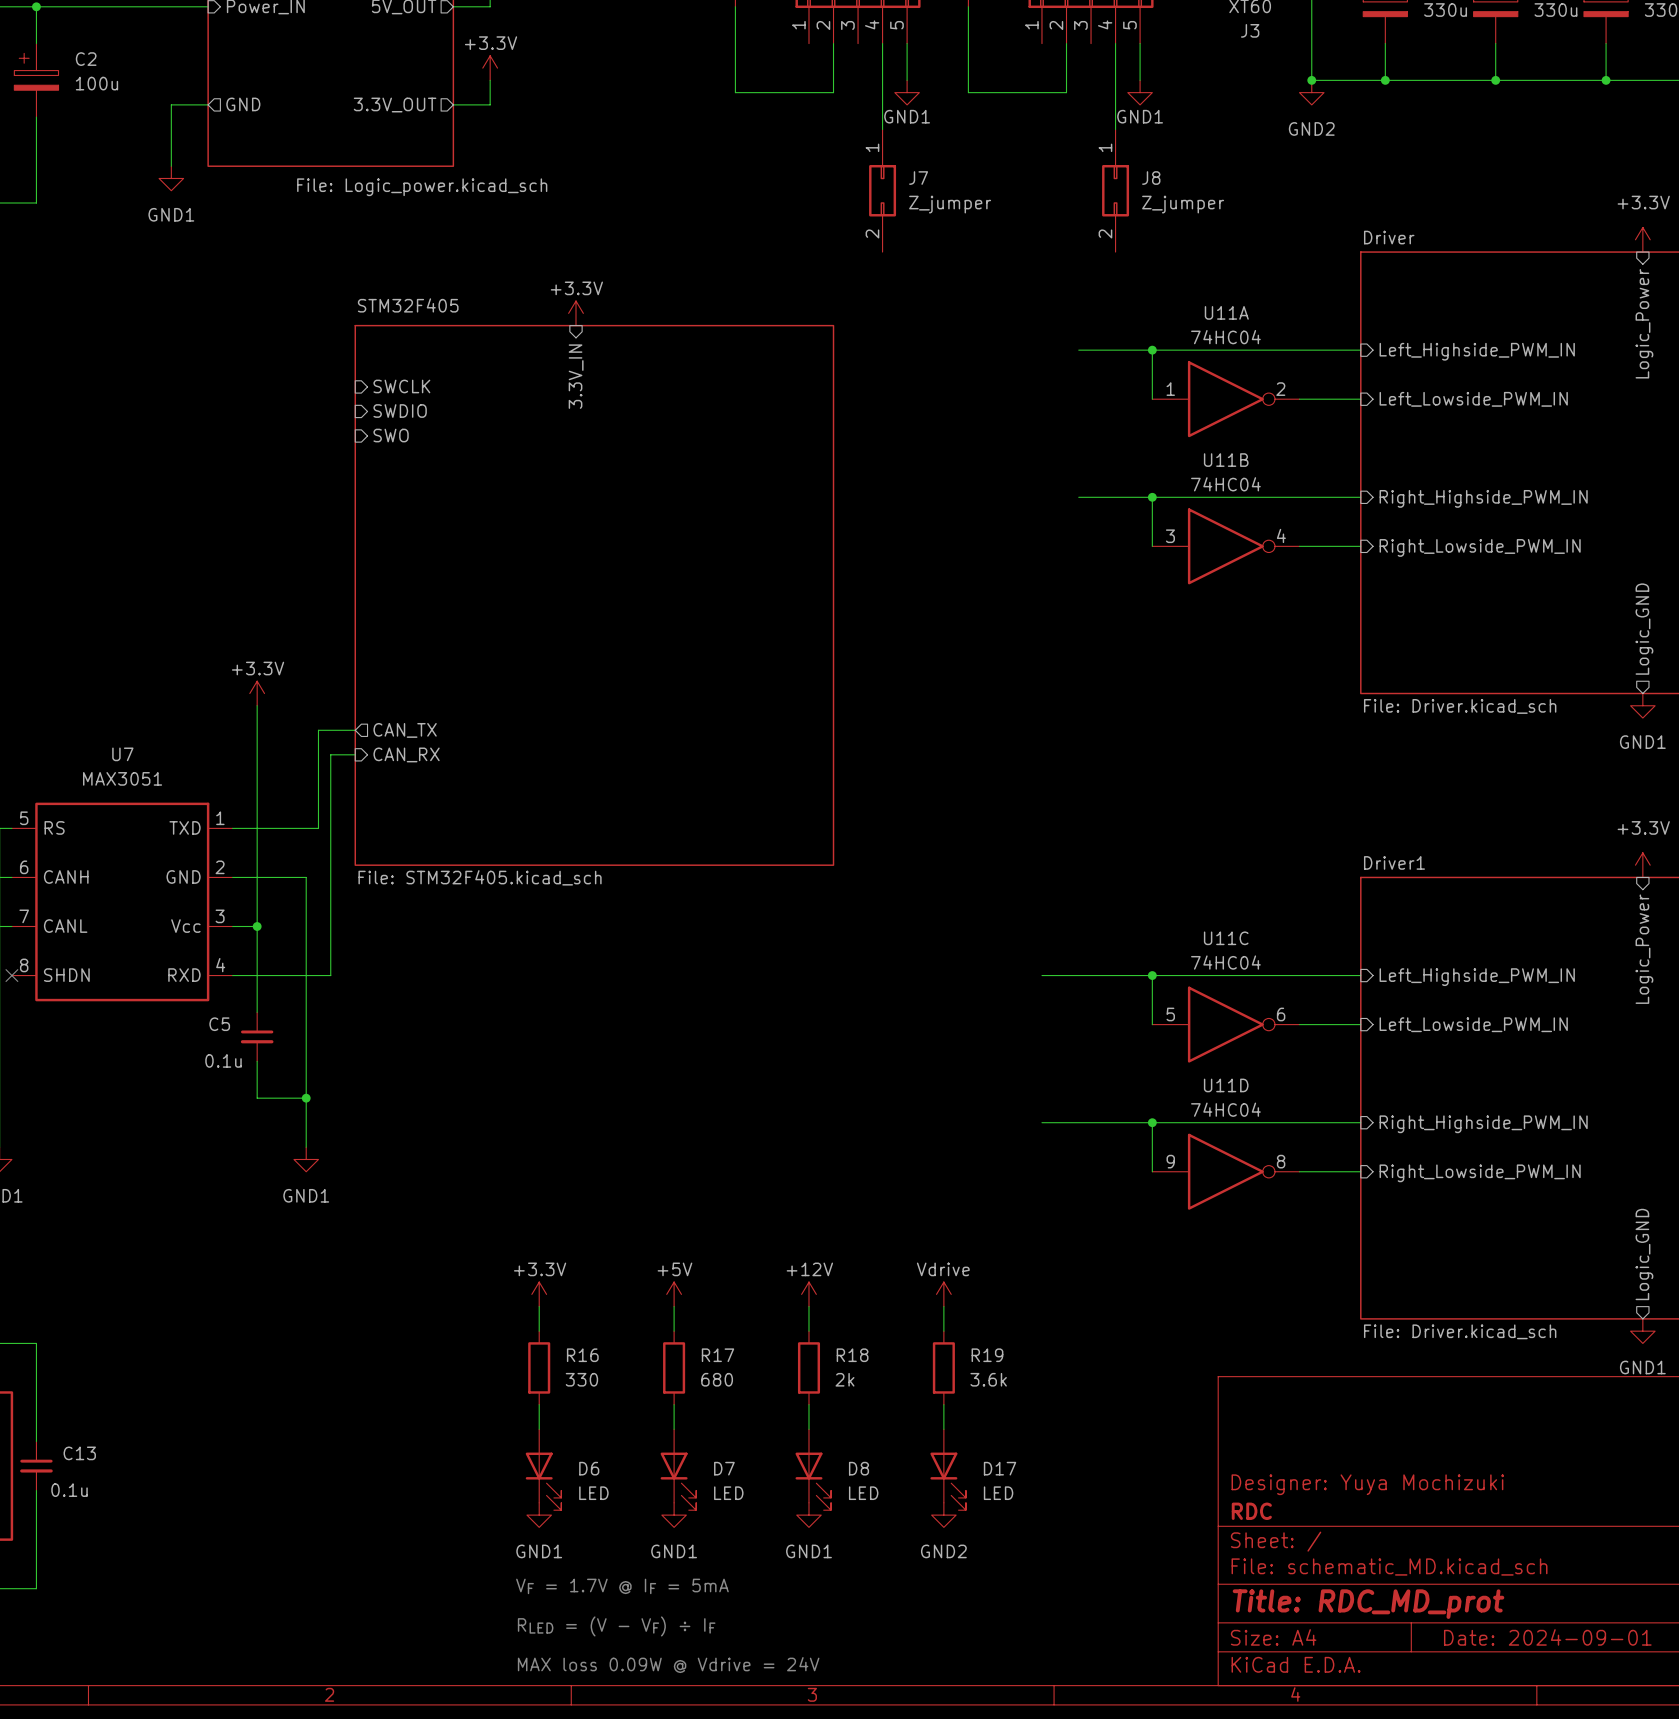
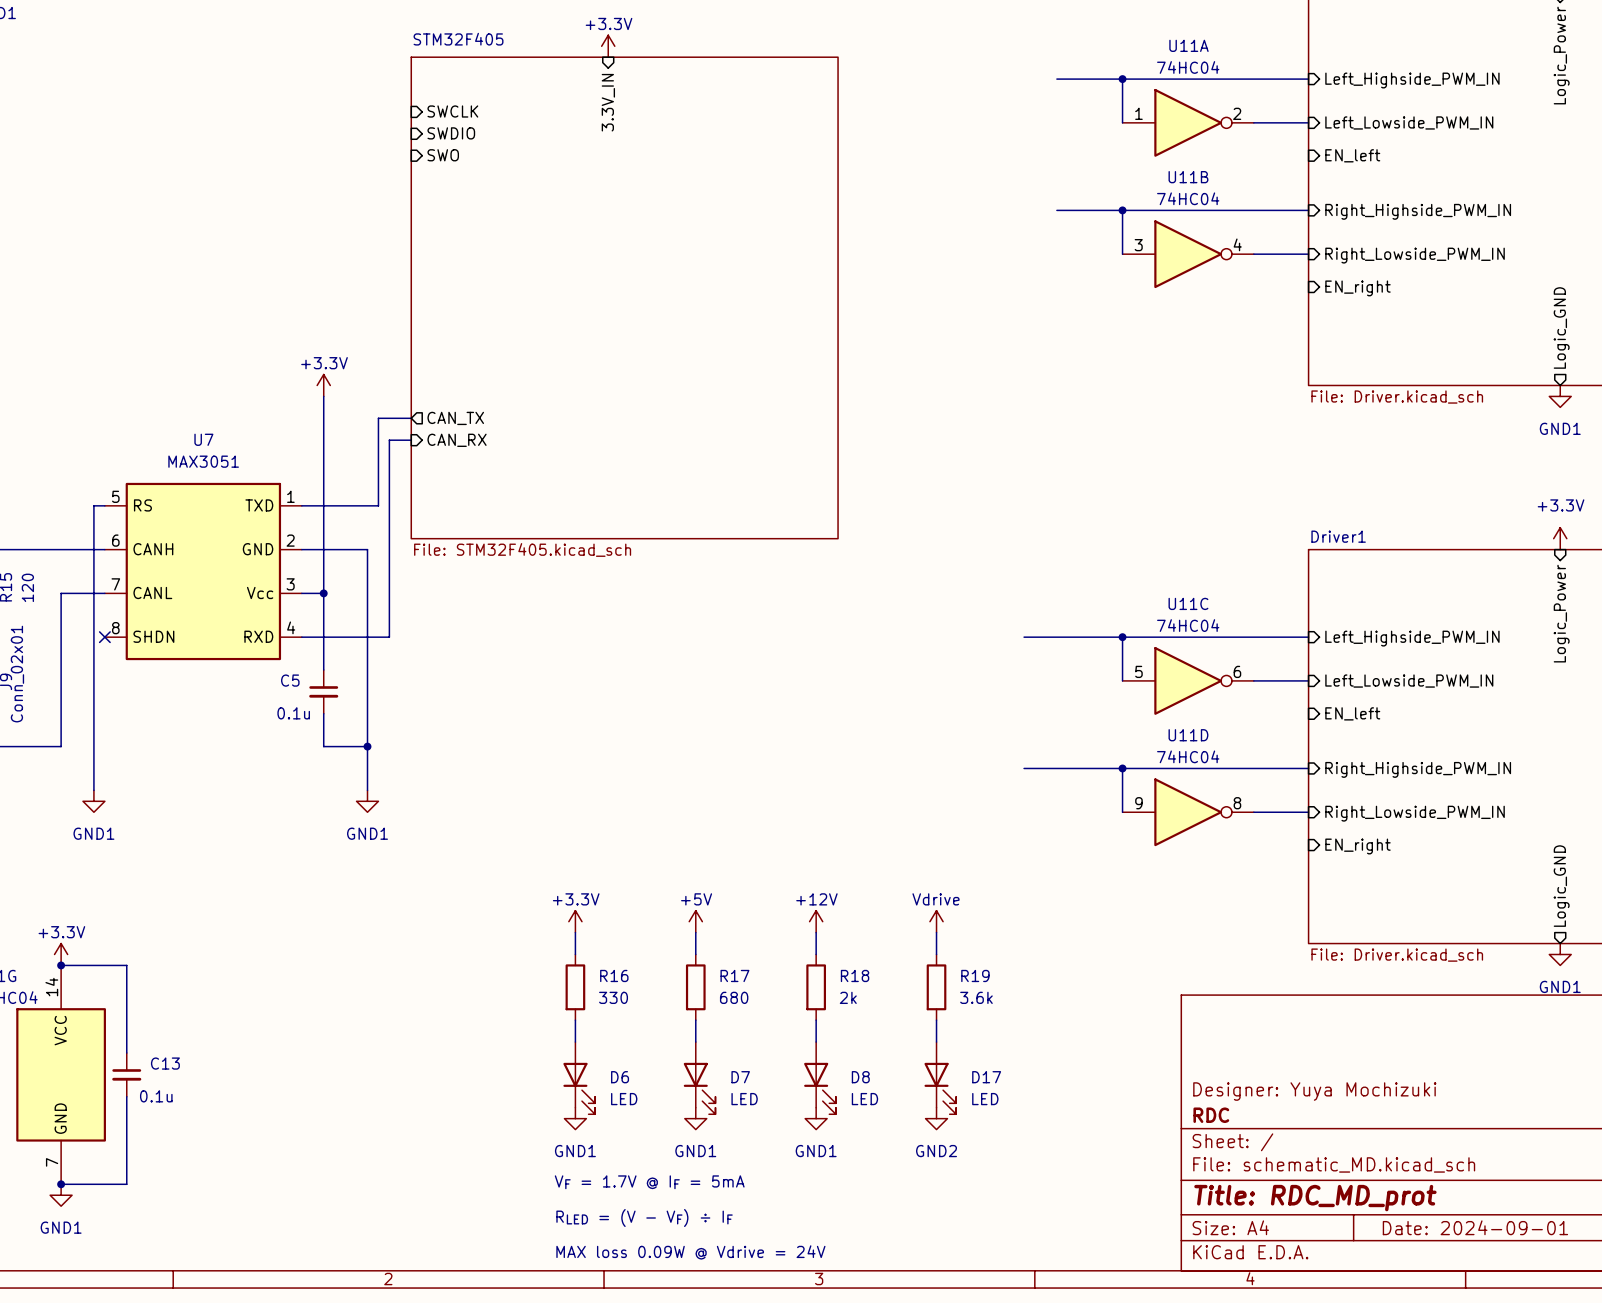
sheet pin: none -> EN_left (1352, 155)
sheet pin: none -> EN_right (1357, 288)
sheet pin: none -> EN_left (1352, 713)
sheet pin: none -> EN_right (1357, 846)

